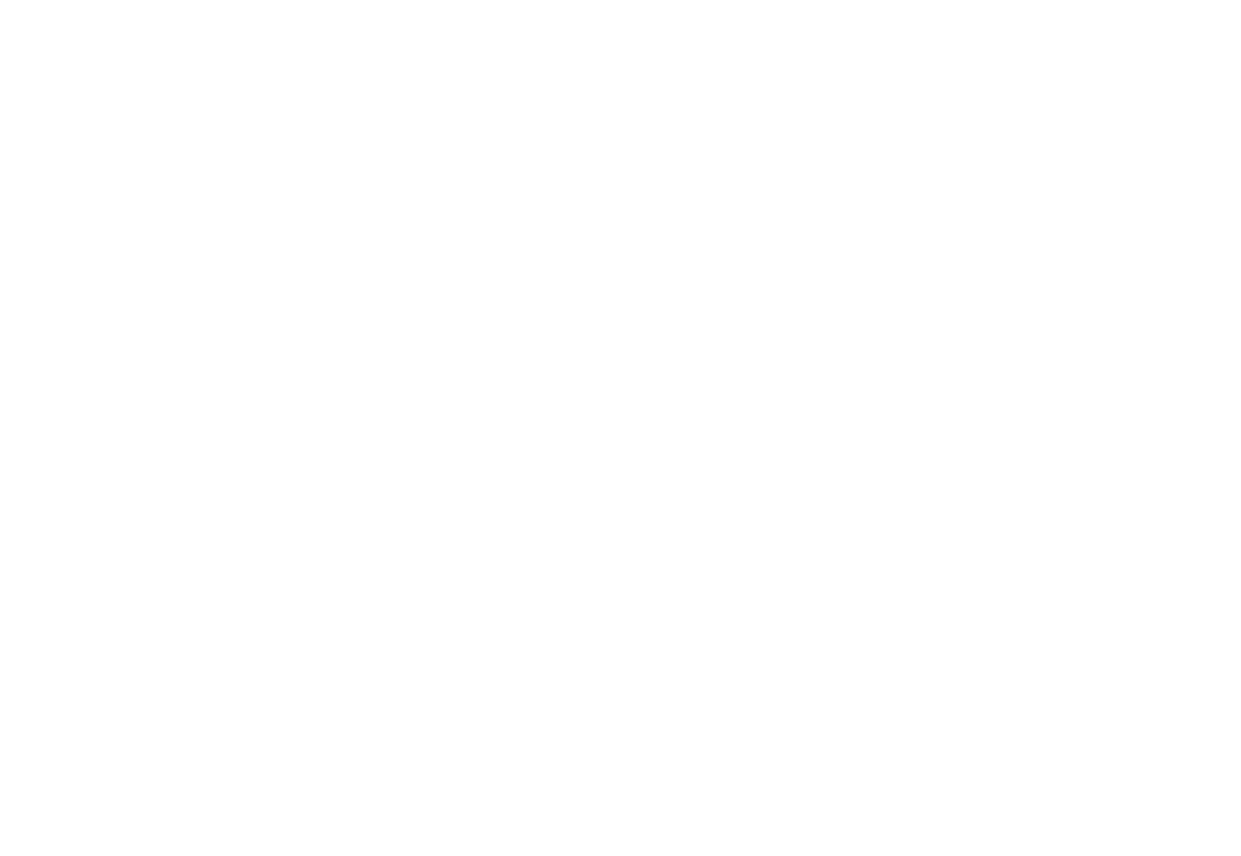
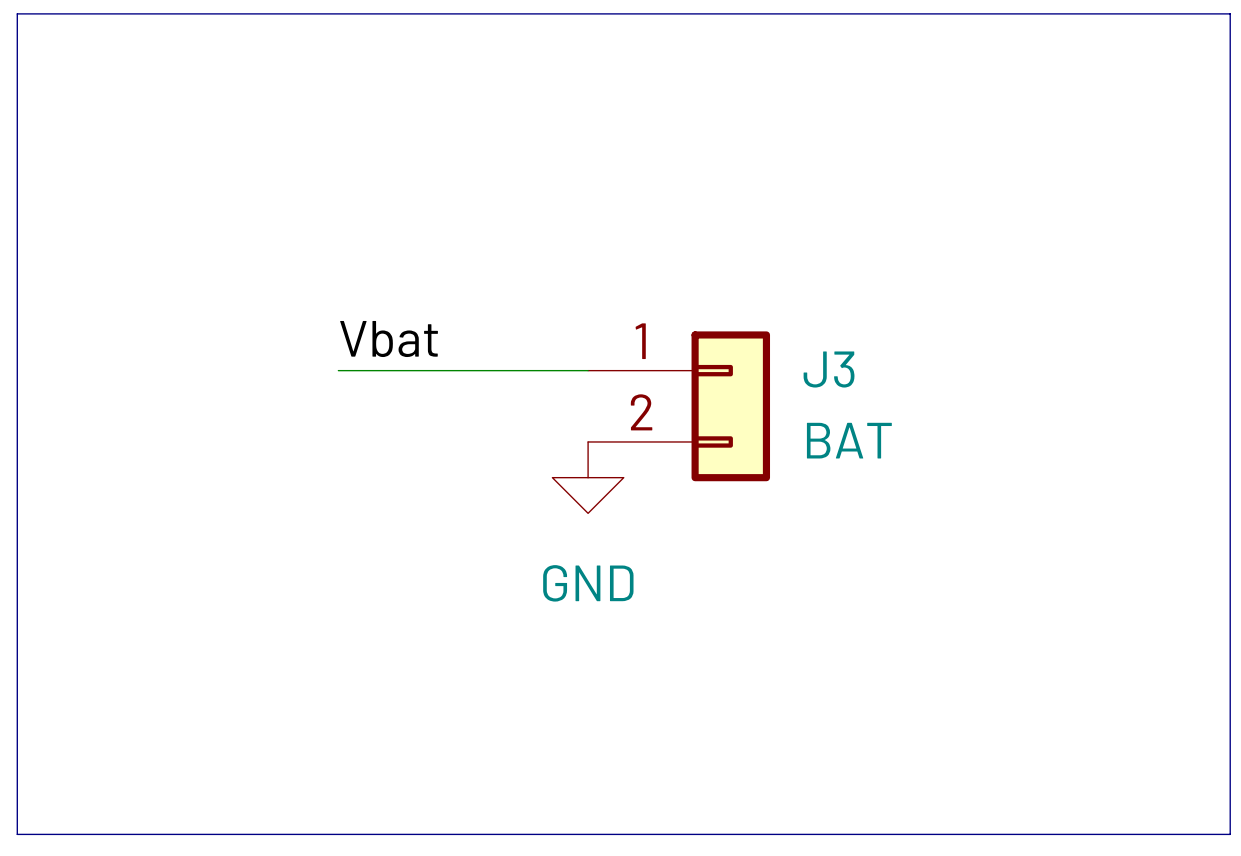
line: none -> (17, 13) (1230, 13) (1230, 834) (17, 834) (17, 13)
label: none -> Vbat (389, 339)
wire: none -> (338, 370) (588, 370)
J3: none -> BAT (679, 406)
power symbol: none -> GND (588, 477)

